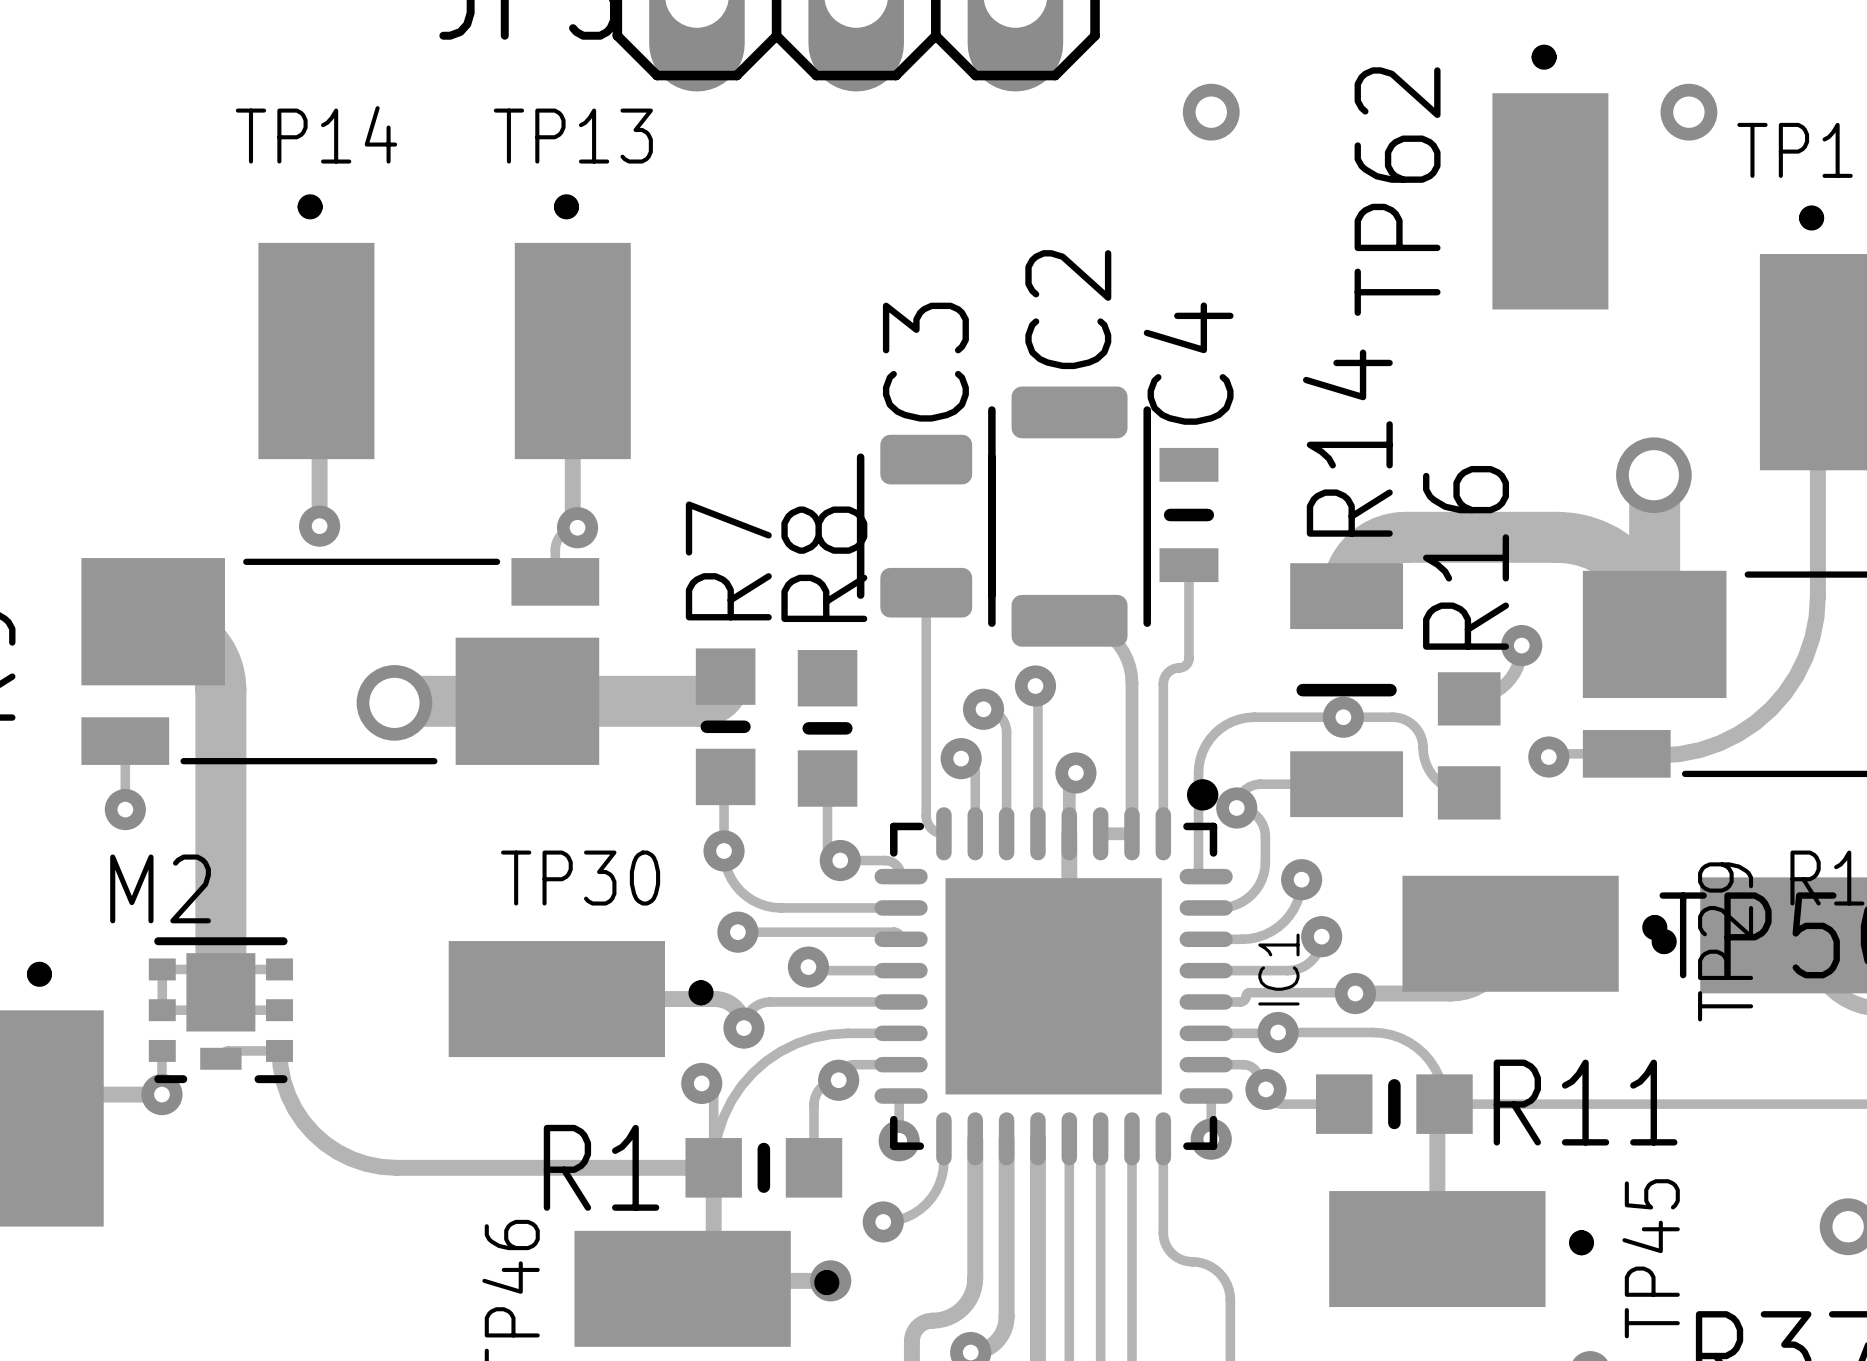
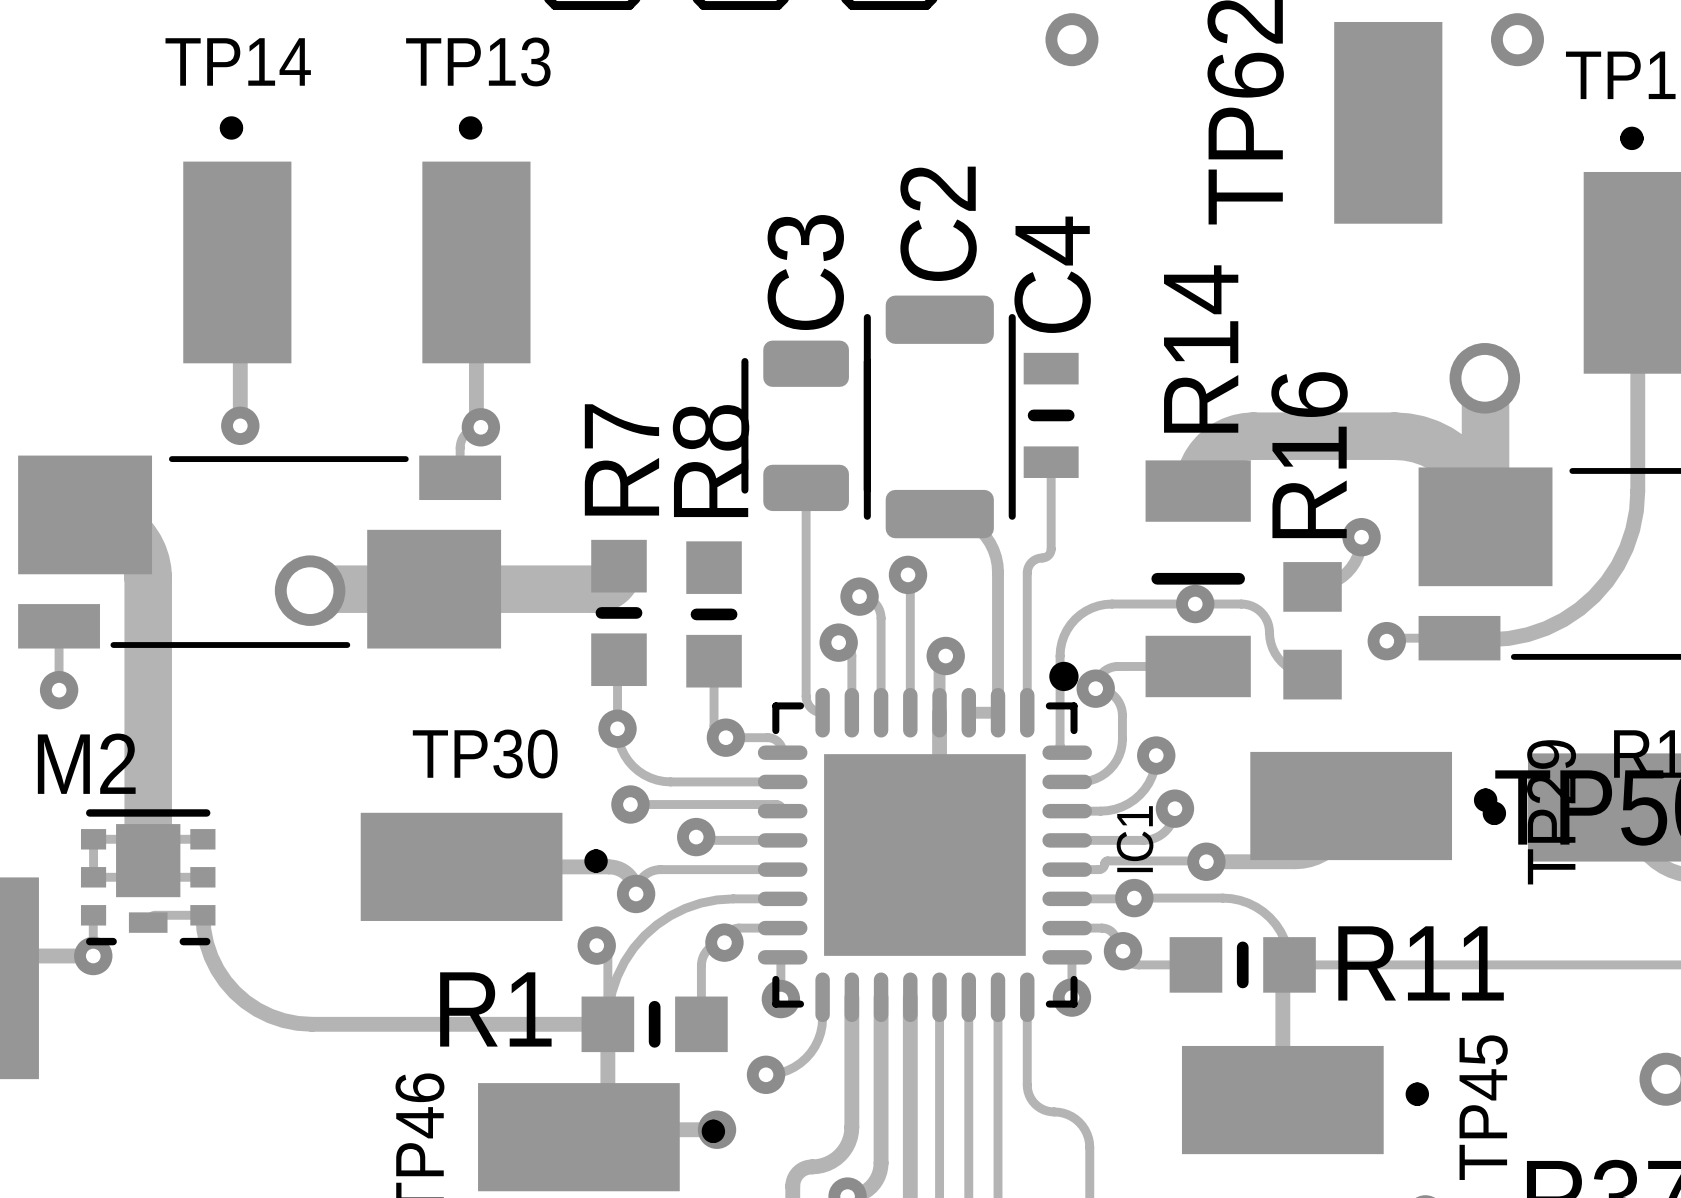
R1 name position: R1 (601, 1167) -> R1 (495, 1009)

